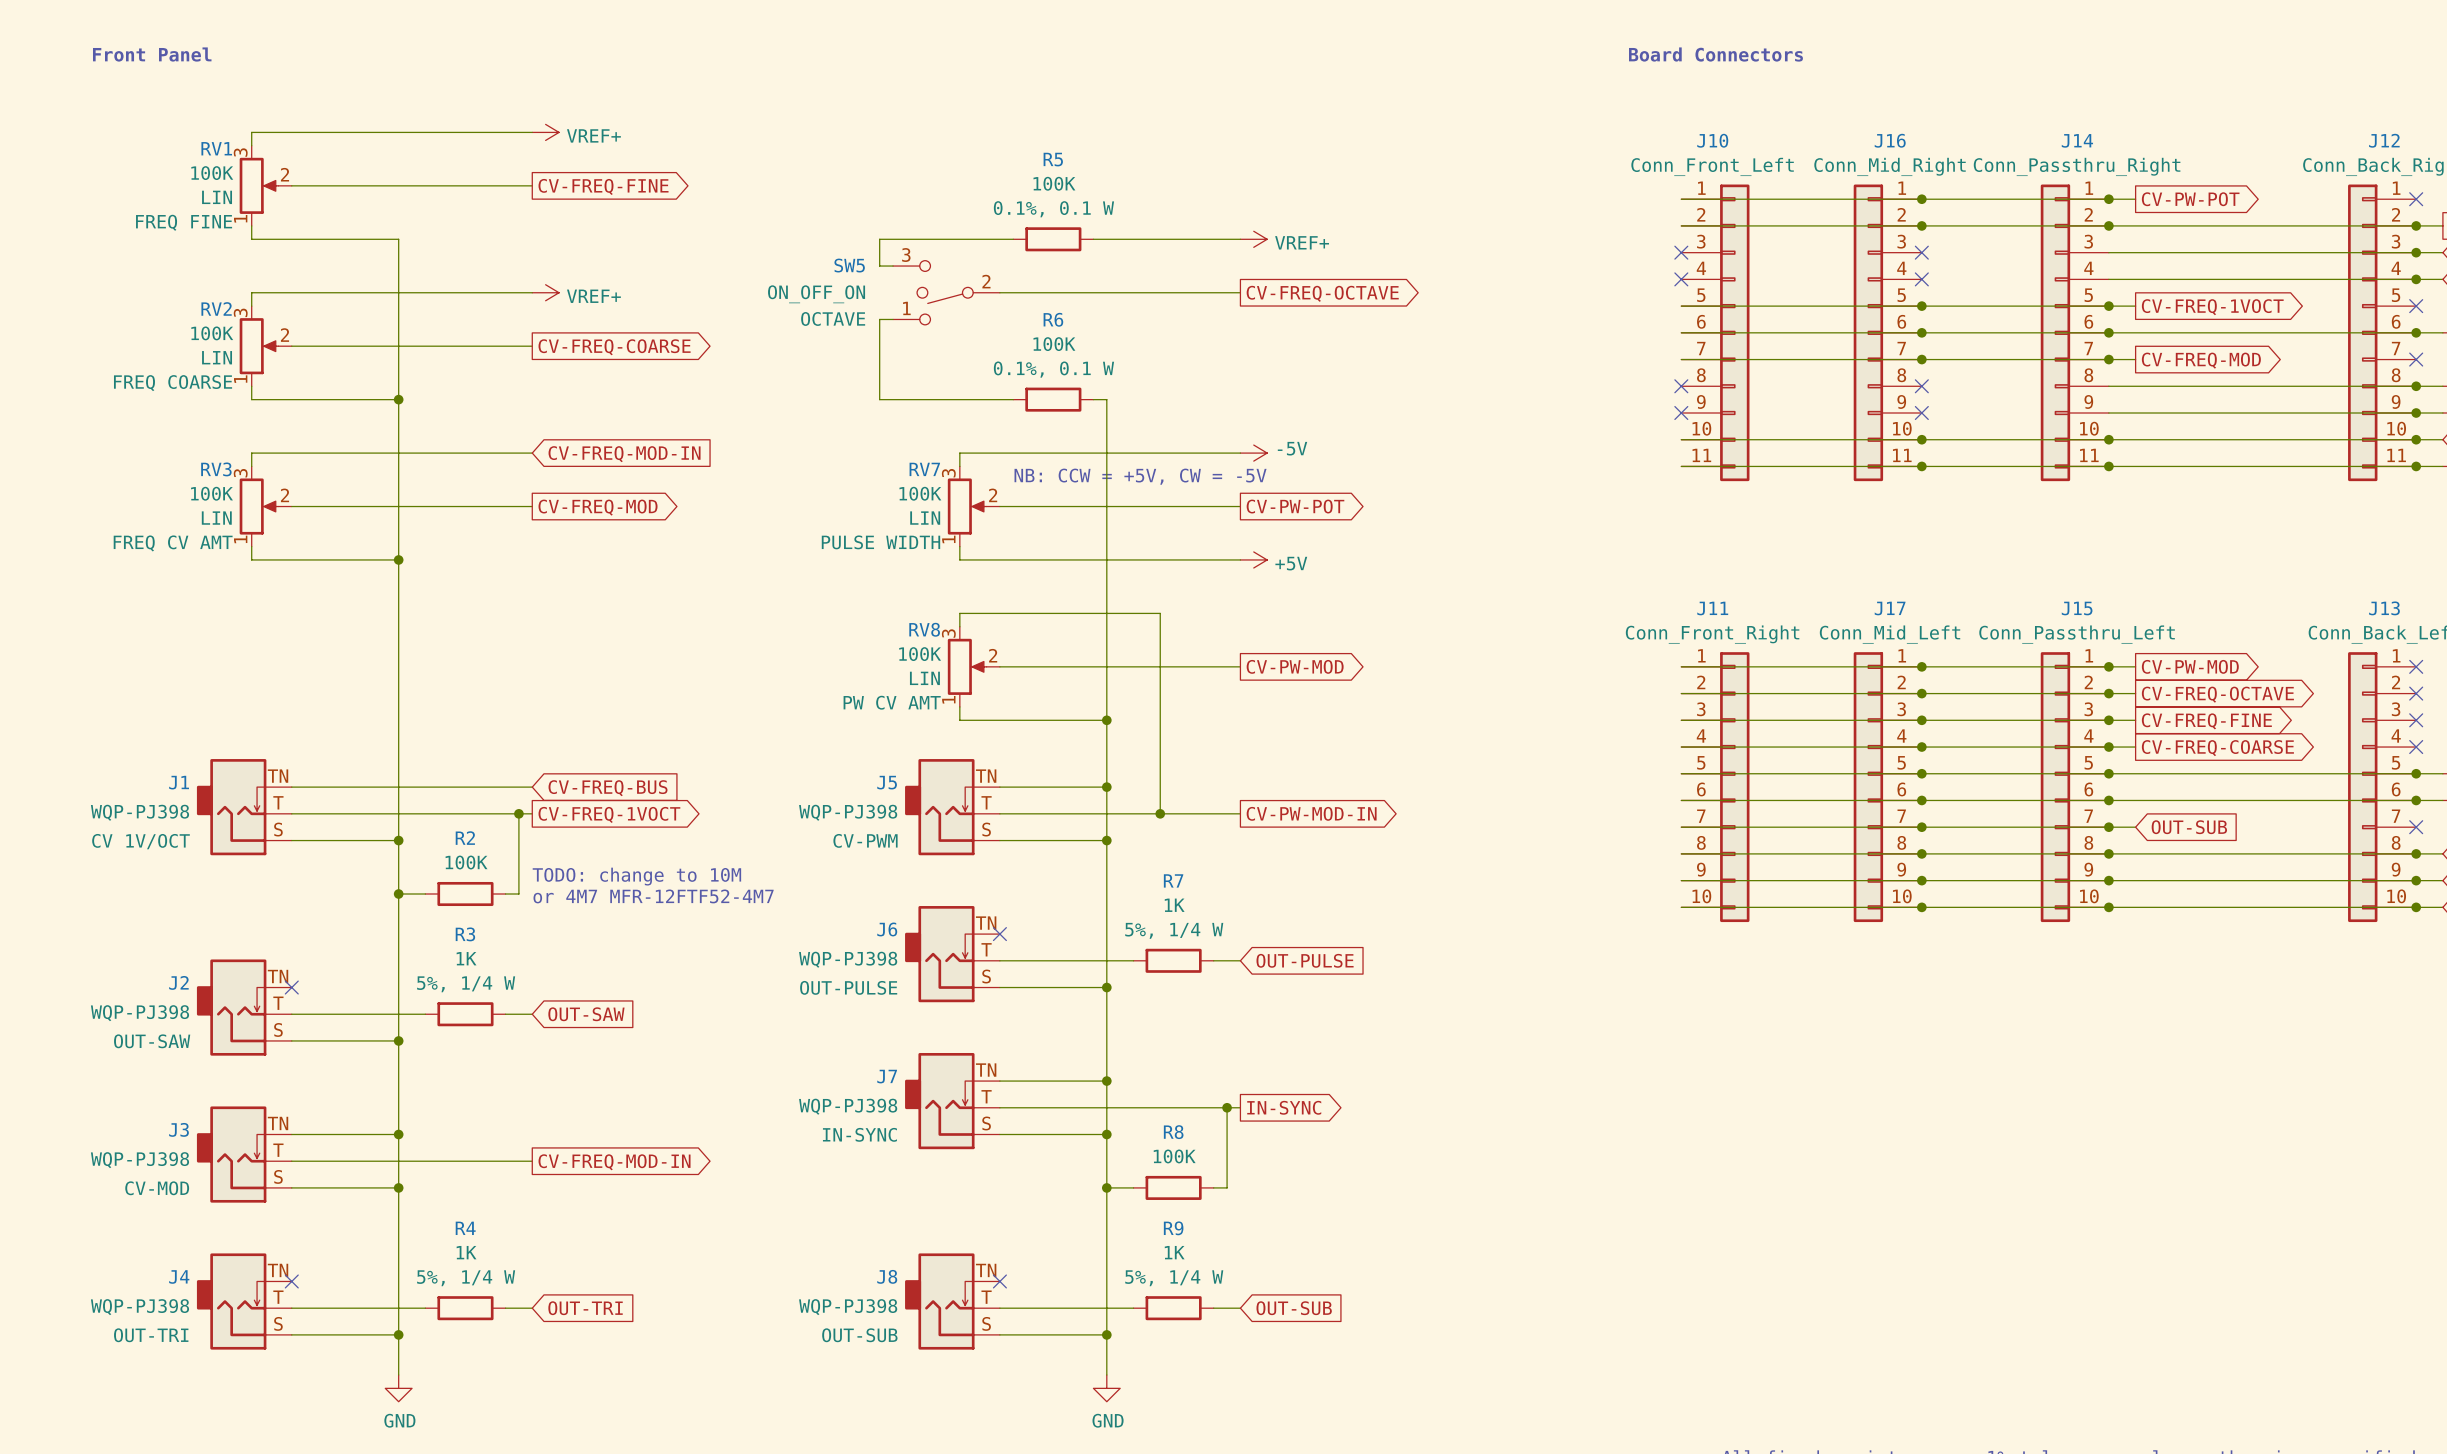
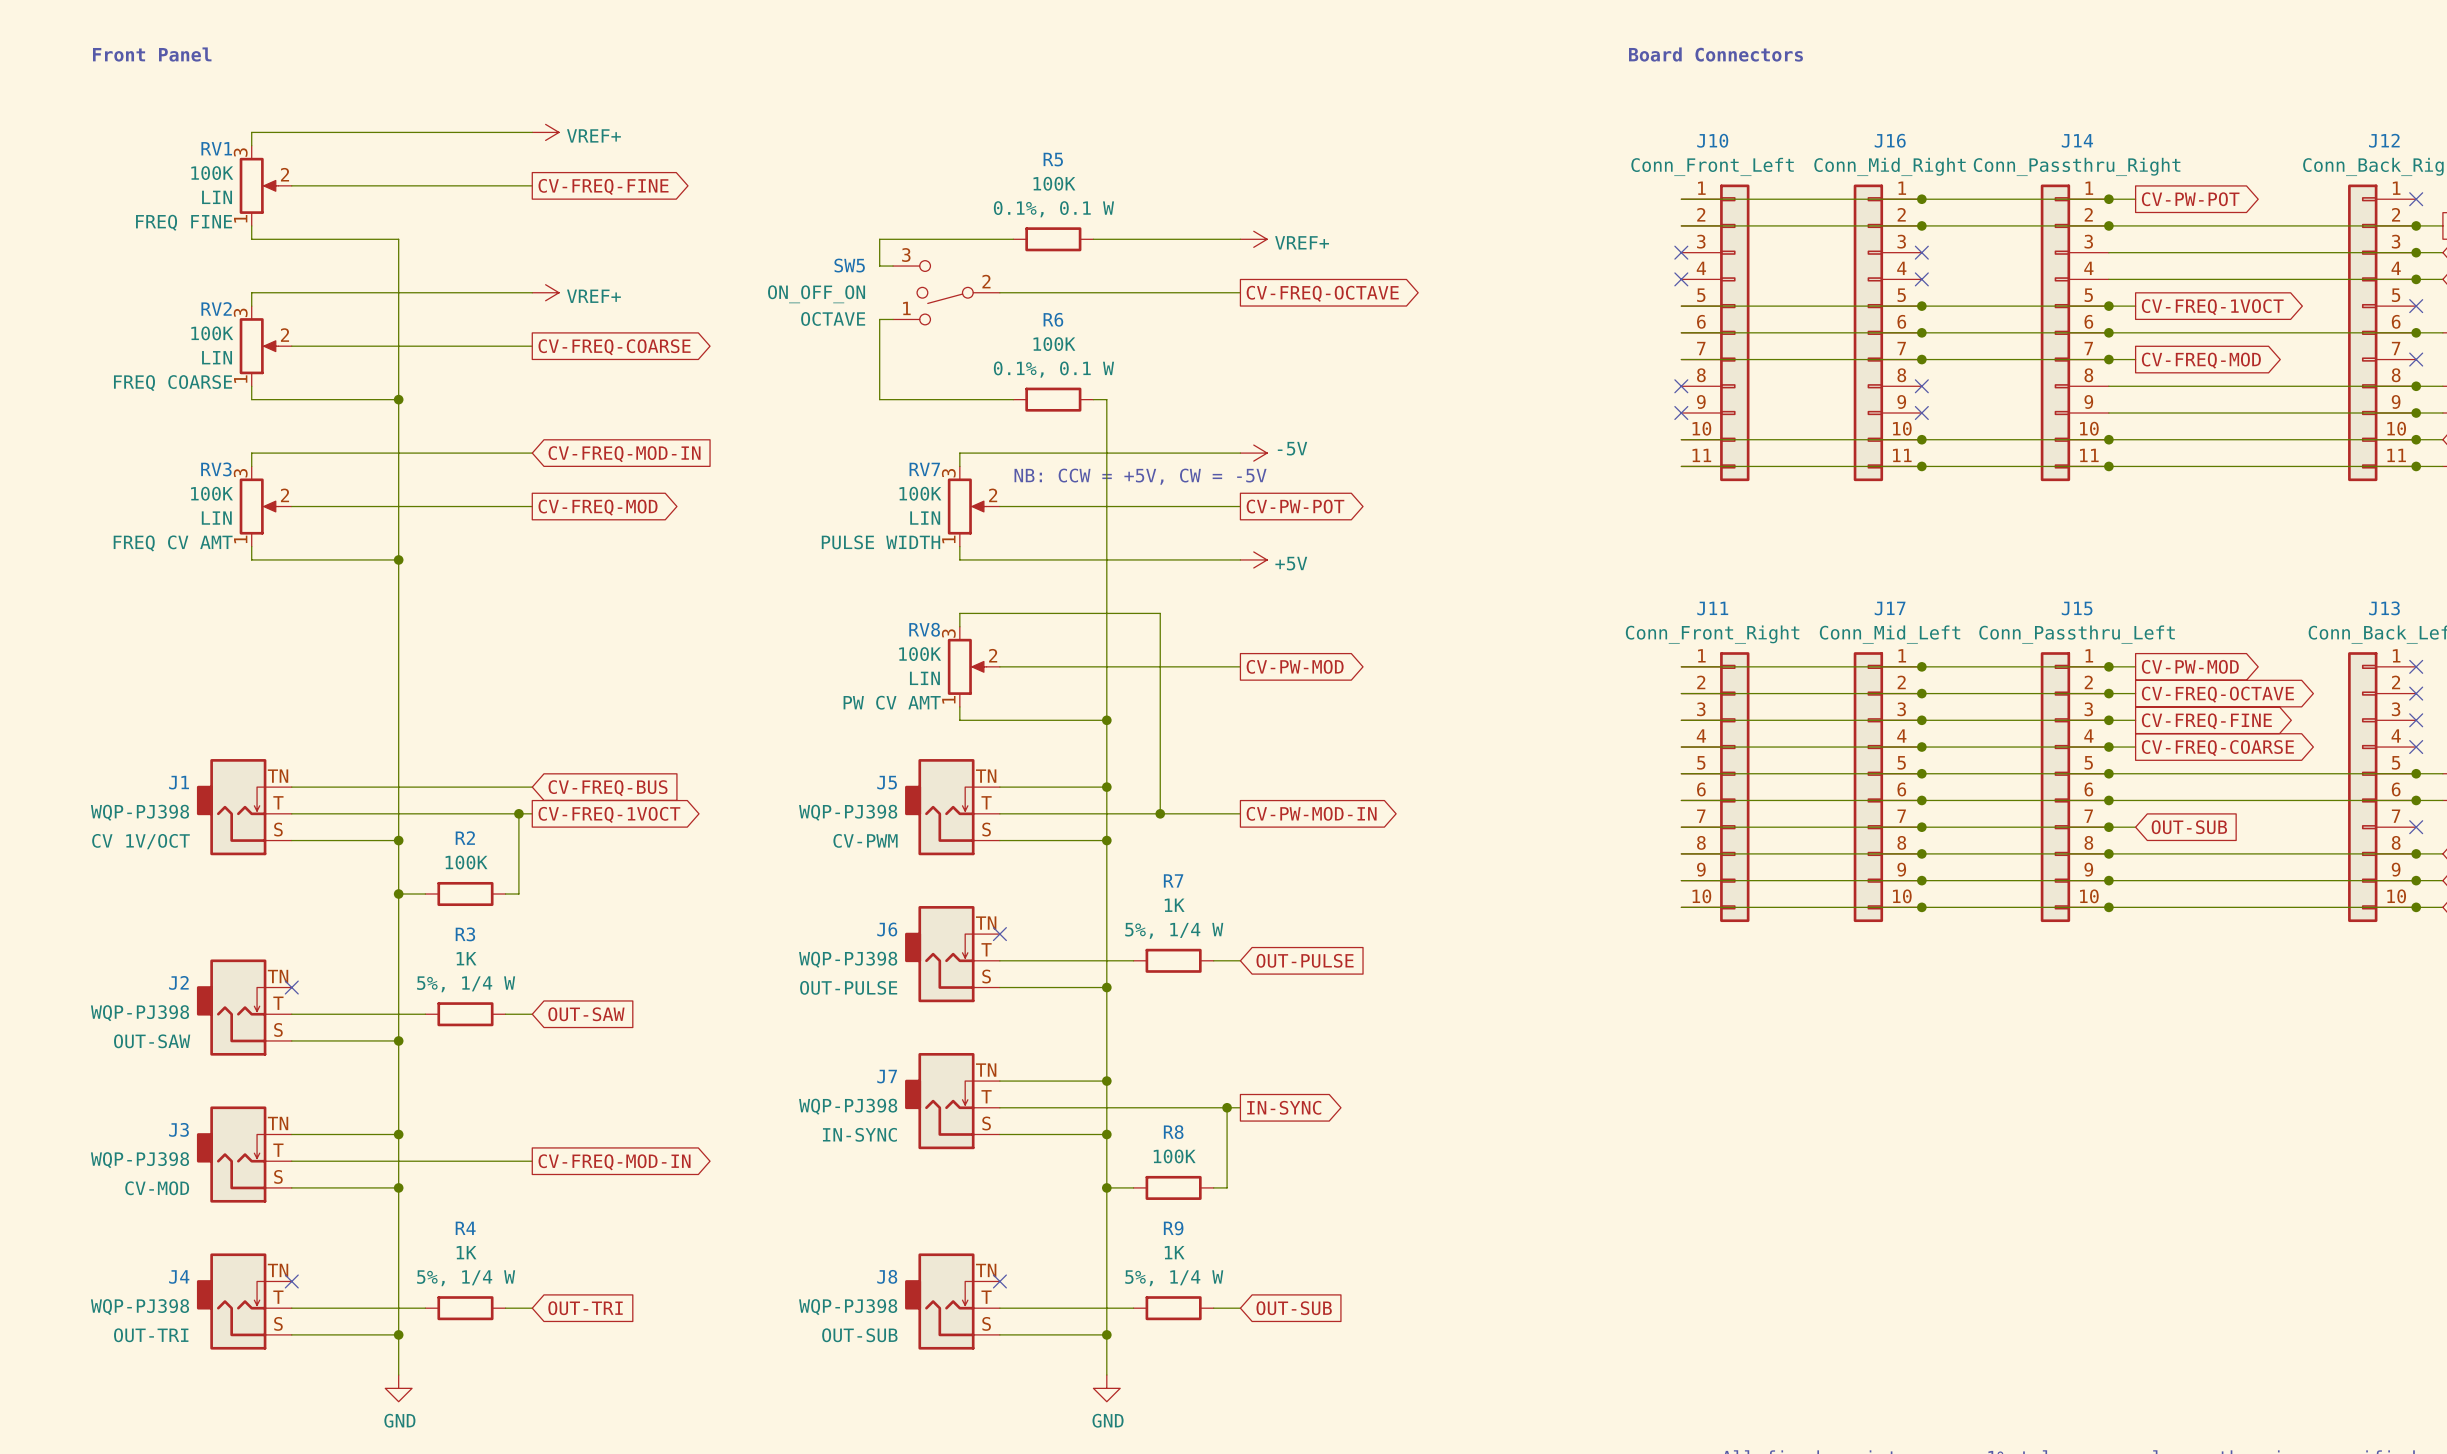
text: TODO: change to 10M (636, 876) -> none
text: or 4M7 MFR-12FTF52-4M7 (653, 896) -> none

